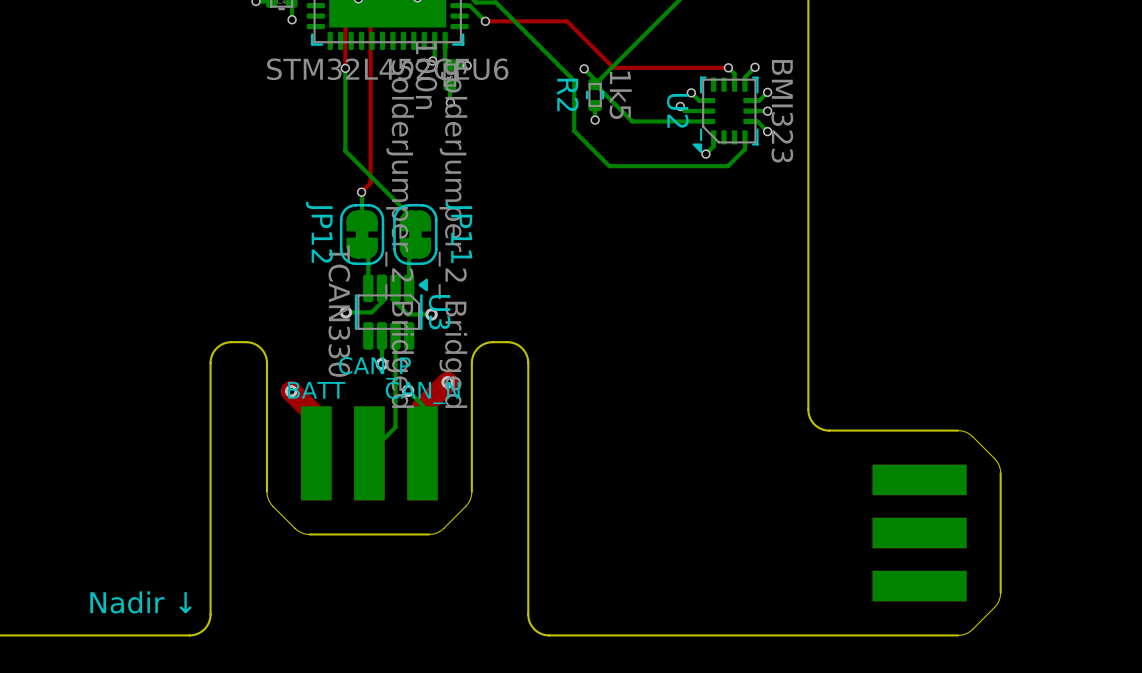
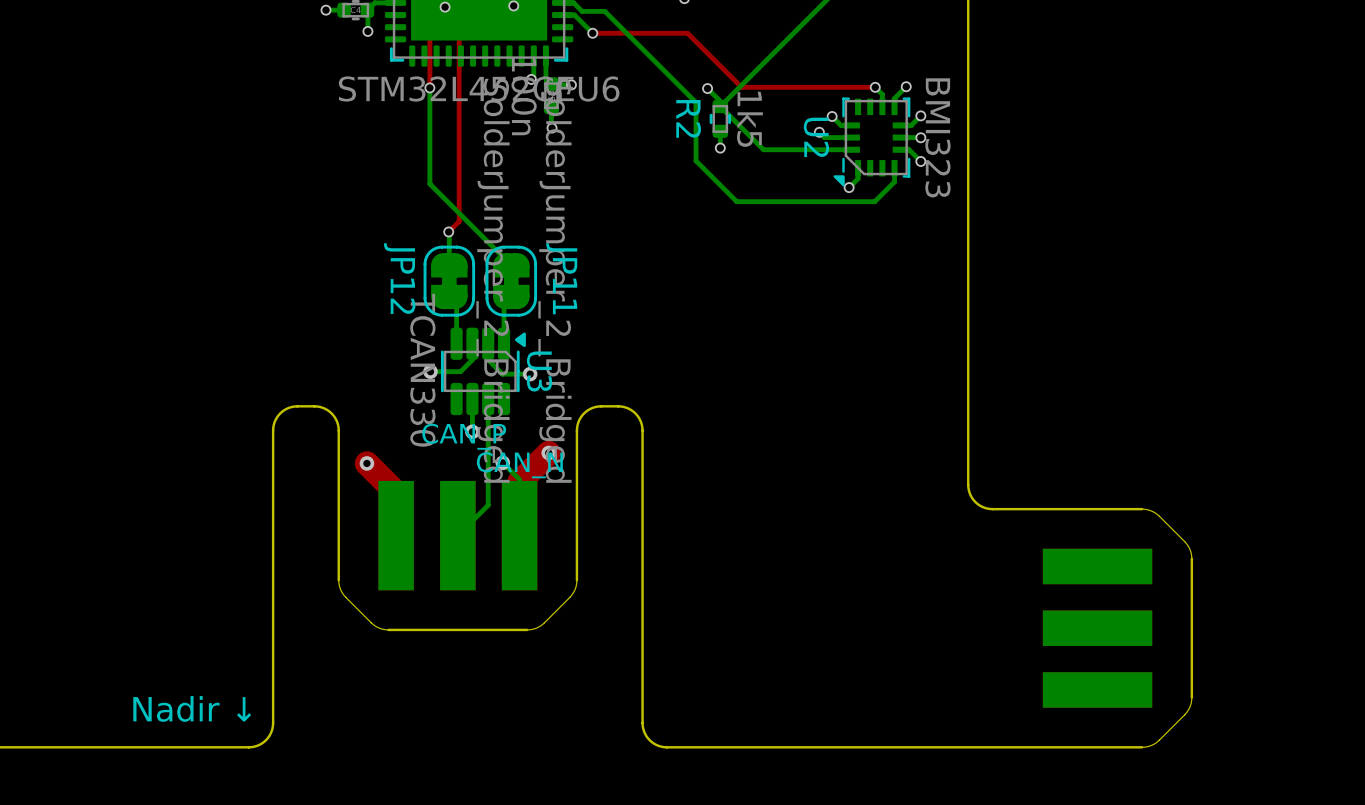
text: BATT (316, 390) -> none

